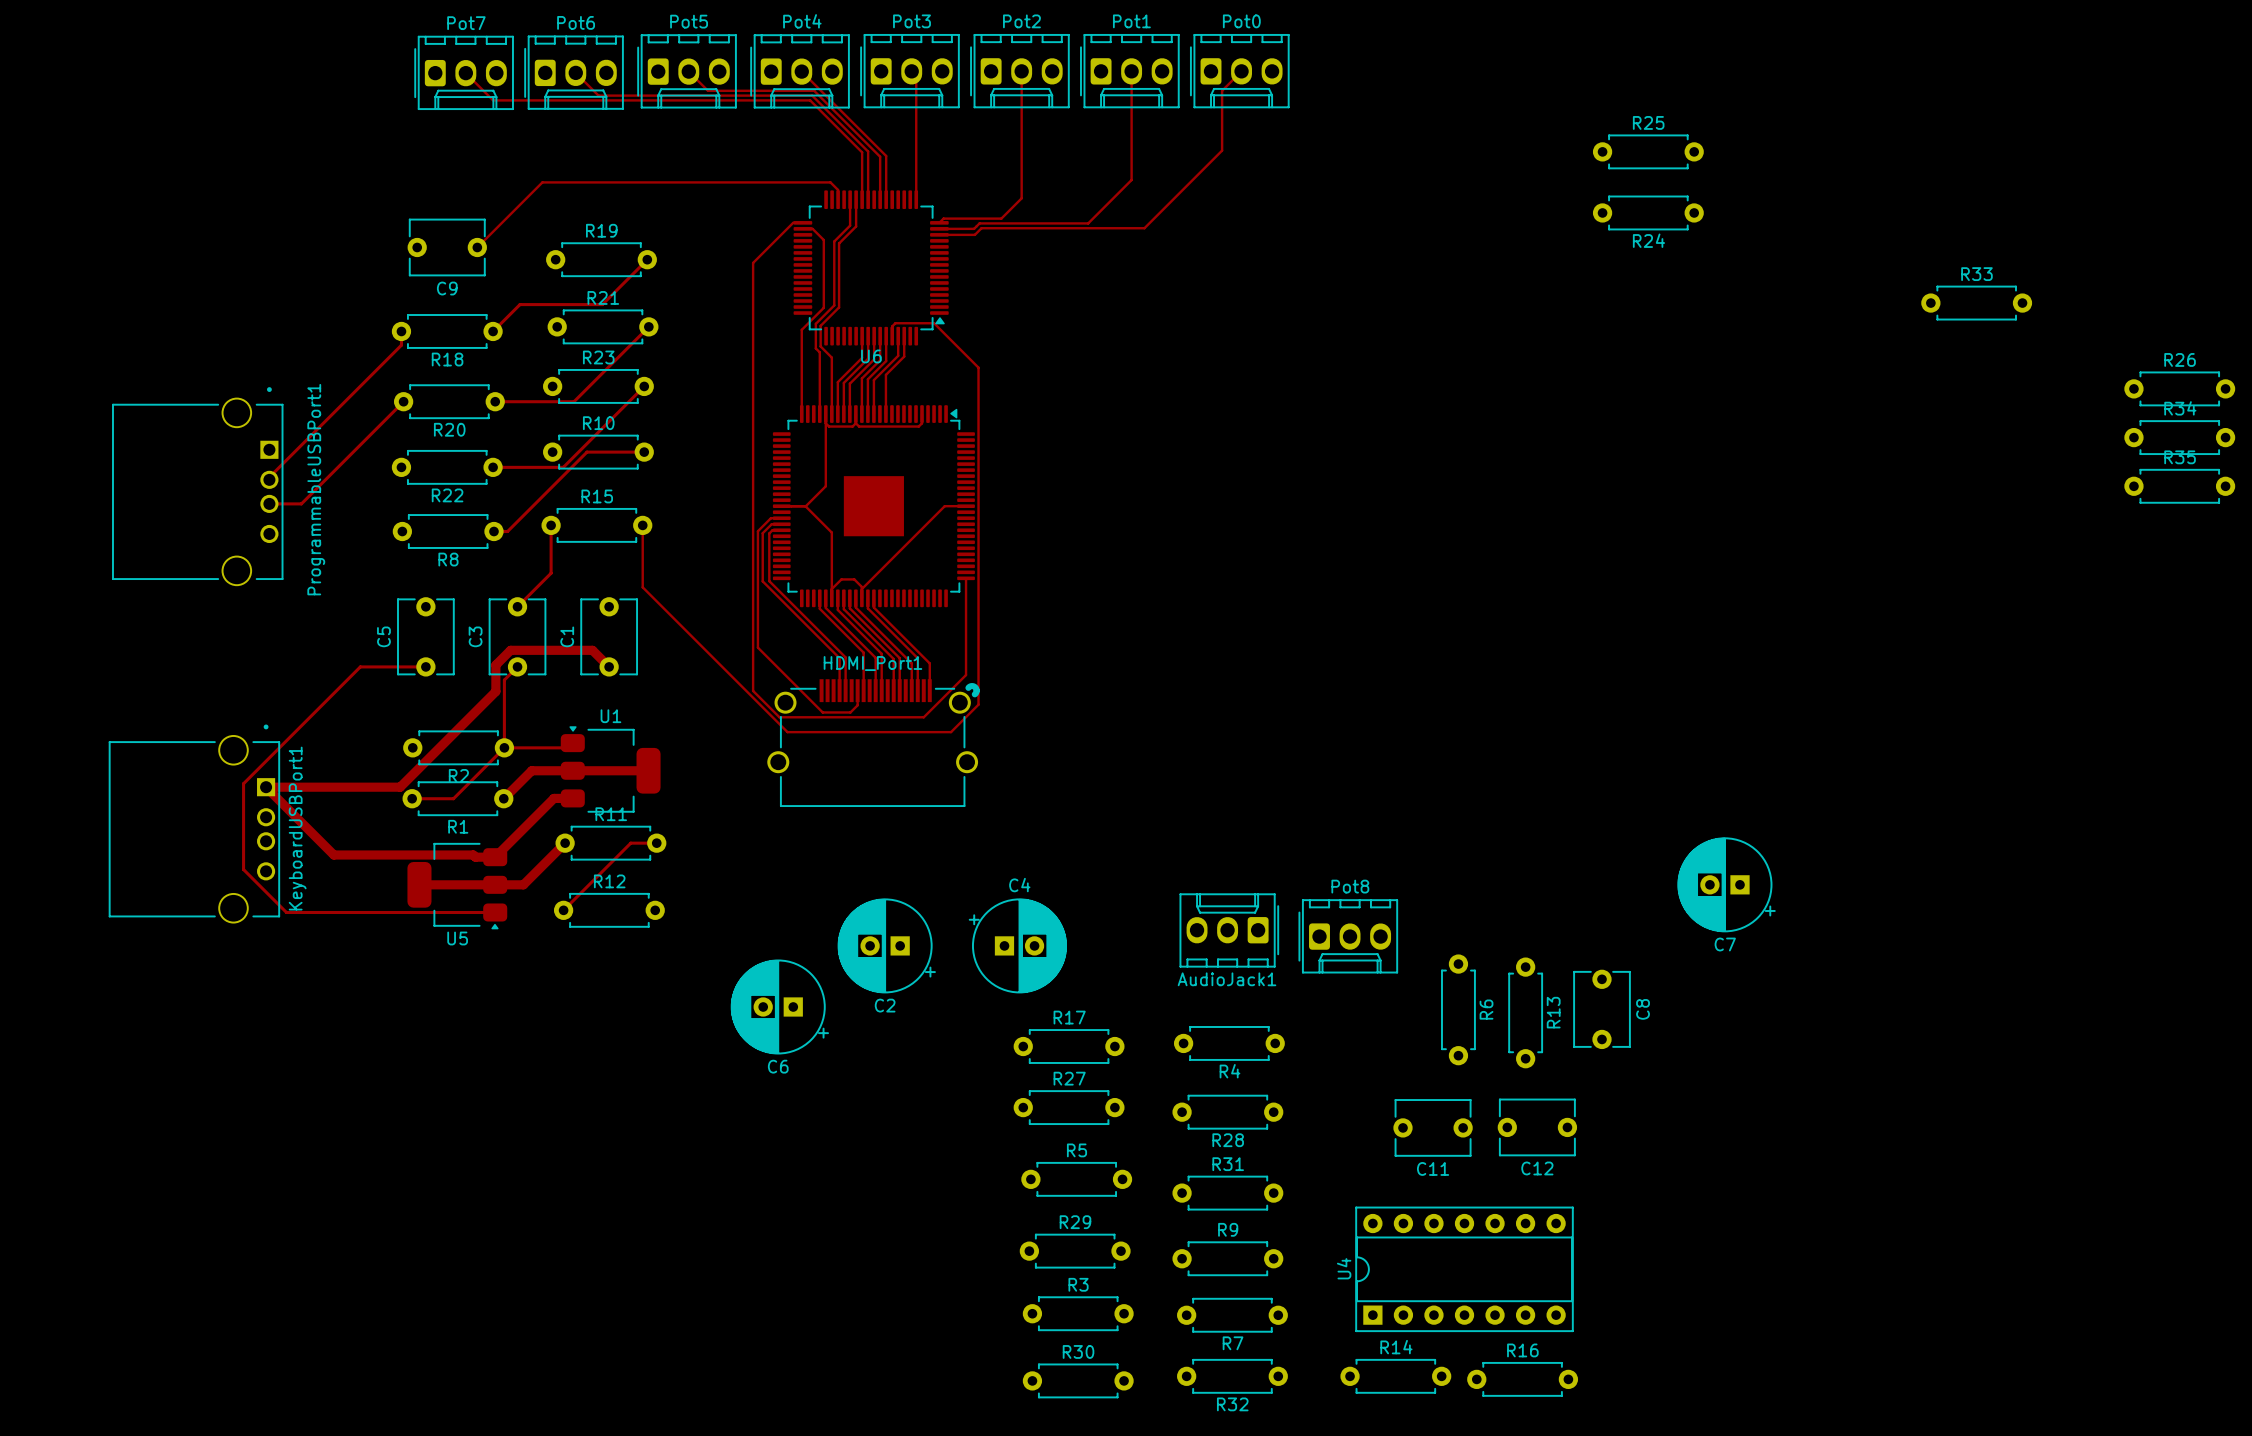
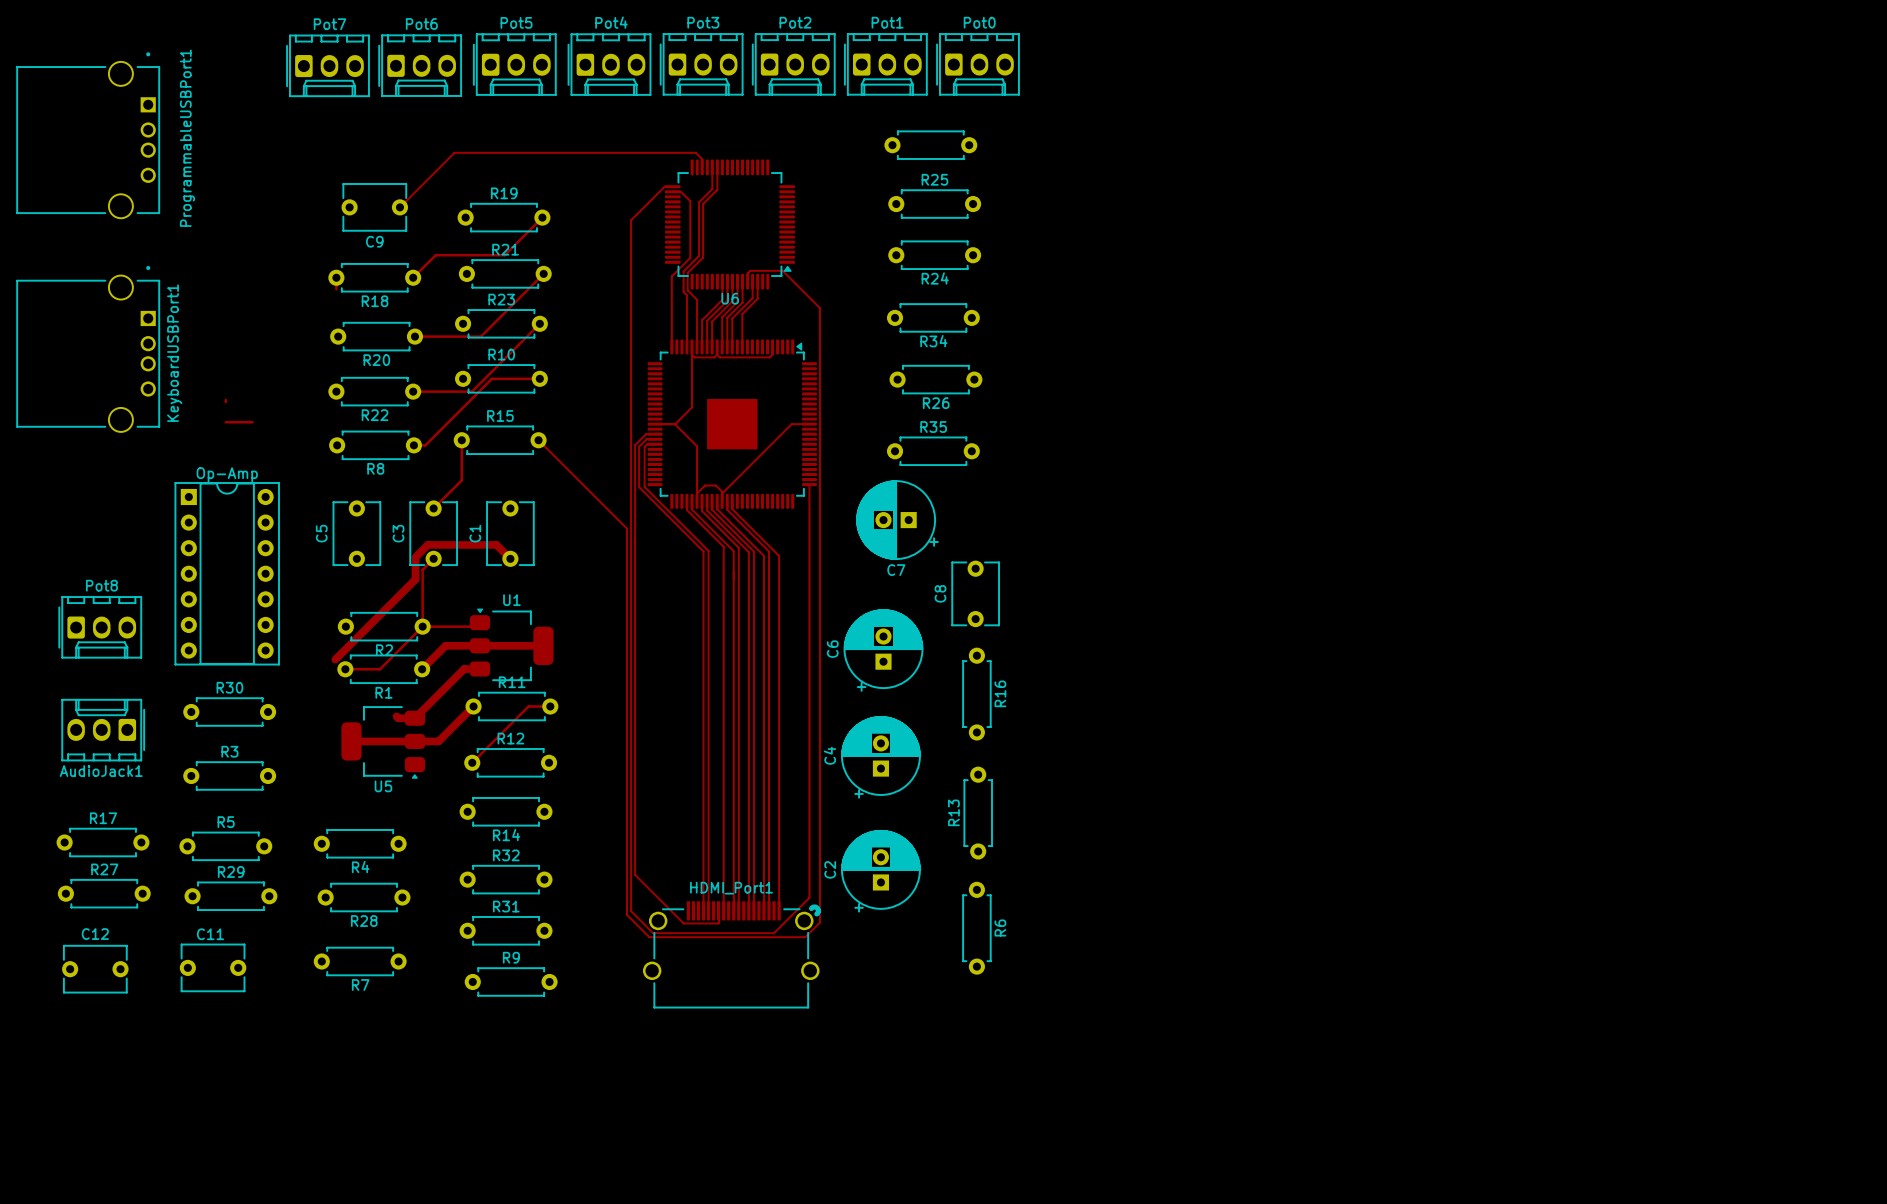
Pot5 position: (687, 71) -> (514, 64)
track: (688, 71) (707, 90) (814, 90) (880, 156) (880, 199) -> none
Pot4 position: (800, 71) -> (609, 64)
track: (801, 71) (886, 156) (886, 199) -> none
Pot3 position: (909, 71) -> (701, 64)
track: (911, 71) (916, 75) (916, 199) -> none
Pot2 position: (1019, 71) -> (793, 64)
track: (1021, 71) (1021, 198) (1001, 218) (943, 218) (939, 222) -> none
Pot1 position: (1129, 71) -> (885, 64)
track: (1131, 71) (1131, 180) (1088, 223) (979, 223) (974, 228) (939, 228) -> none
Pot0 position: (1239, 71) -> (978, 64)
track: (1241, 71) (1222, 90) (1222, 150) (1144, 228) (981, 228) (974, 234) (939, 234) -> none
Pot7 position: (464, 72) -> (328, 65)
Pot6 position: (574, 72) -> (420, 65)
track: (575, 72) (598, 95) (812, 95) (868, 151) (868, 199) -> none
track: (465, 73) (493, 100) (810, 100) (862, 152) (862, 199) -> none
R25 position: (1648, 151) -> (934, 204)
part: none -> (930, 145)
R24 position: (1648, 212) -> (934, 255)
R33: (1976, 303) -> none
track: (401, 345) (269, 477) -> none
R26 name position: R26 (2180, 359) -> R26 (936, 403)
R26 position: (2179, 388) -> (935, 379)
track: (403, 401) (301, 503) -> none
R34 name position: R34 (2180, 408) -> R34 (933, 341)
R34 position: (2179, 437) -> (933, 317)
ProgrammableUSBPort1 position: (197, 486) -> (88, 135)
R35 position: (2179, 486) -> (933, 451)
track: (642, 525) (642, 587) (787, 732) (951, 732) (978, 704) -> (538, 440) (627, 528) (627, 914) (649, 937) (805, 937) (819, 922) (819, 590)
track: (757, 647) (822, 712) (850, 712) (857, 705) (857, 690) -> (635, 542) (635, 874) (683, 923) (718, 923) (719, 911)
track: (425, 666) (360, 666) (243, 783) (243, 869) (286, 912) (495, 912) -> none
track: (966, 675) (923, 717) (779, 717) (753, 690) -> (809, 565) (809, 897) (774, 933) (653, 933) (631, 911) (631, 578)
Op-Amp: none -> (227, 573)
track: none -> (703, 578) (703, 910)
track: none -> (708, 578) (708, 910)
track: none -> (723, 578) (723, 910)
track: none -> (733, 578) (734, 909)
track: none -> (738, 578) (738, 910)
track: none -> (748, 578) (748, 910)
track: none -> (753, 578) (753, 910)
track: none -> (763, 578) (763, 910)
track: none -> (769, 578) (769, 910)
track: none -> (779, 578) (779, 910)
HDMI_Port1 position: (873, 743) -> (731, 954)
track: (400, 787) (266, 787) (333, 855) (473, 855) -> none
KeyboardUSBPort1 position: (194, 823) -> (88, 348)
C7 position: (1726, 884) -> (897, 520)
AudioJack1 position: (1229, 930) -> (103, 730)
Pot8 position: (1348, 936) -> (100, 627)
C2 rotation: 0° (886, 945) -> 90° clockwise (880, 871)
C2 position: (886, 945) -> (880, 871)
C4 rotation: 0° (1017, 945) -> 90° counterclockwise (880, 757)
C6 rotation: 0° (779, 1006) -> 90° clockwise (883, 650)
C6 position: (779, 1006) -> (883, 650)
R6 position: (1458, 1009) -> (976, 928)
C8 position: (1601, 1009) -> (975, 593)
C8 name position: C8 (1643, 1009) -> C8 (940, 593)
R13 position: (1525, 1012) -> (978, 813)
R13 name position: R13 (1553, 1012) -> R13 (953, 812)
R4 position: (1229, 1043) -> (360, 843)
R17 position: (1069, 1046) -> (103, 842)
R27 position: (1069, 1107) -> (104, 893)
R28 position: (1227, 1112) -> (364, 897)
C11 position: (1433, 1127) -> (213, 967)
C12 position: (1537, 1127) -> (95, 969)
C11 name position: C11 (1433, 1168) -> C11 (210, 934)
C12 name position: C12 (1537, 1168) -> C12 (95, 934)
R5 position: (1076, 1179) -> (225, 846)
R31 position: (1227, 1193) -> (506, 930)
R29 position: (1075, 1251) -> (230, 896)
R9 position: (1227, 1258) -> (511, 981)
U4: (1464, 1269) -> none
R3 position: (1078, 1313) -> (229, 775)
R7 position: (1232, 1315) -> (360, 961)
R14 name position: R14 (1396, 1347) -> R14 (506, 835)
R32 position: (1232, 1376) -> (506, 879)
R14 position: (1395, 1376) -> (506, 811)
R16 rotation: 0° (1522, 1379) -> 90° clockwise (976, 694)
R16 position: (1522, 1379) -> (976, 694)
R30 position: (1078, 1380) -> (229, 712)
R32 name position: R32 (1232, 1404) -> R32 (506, 855)

